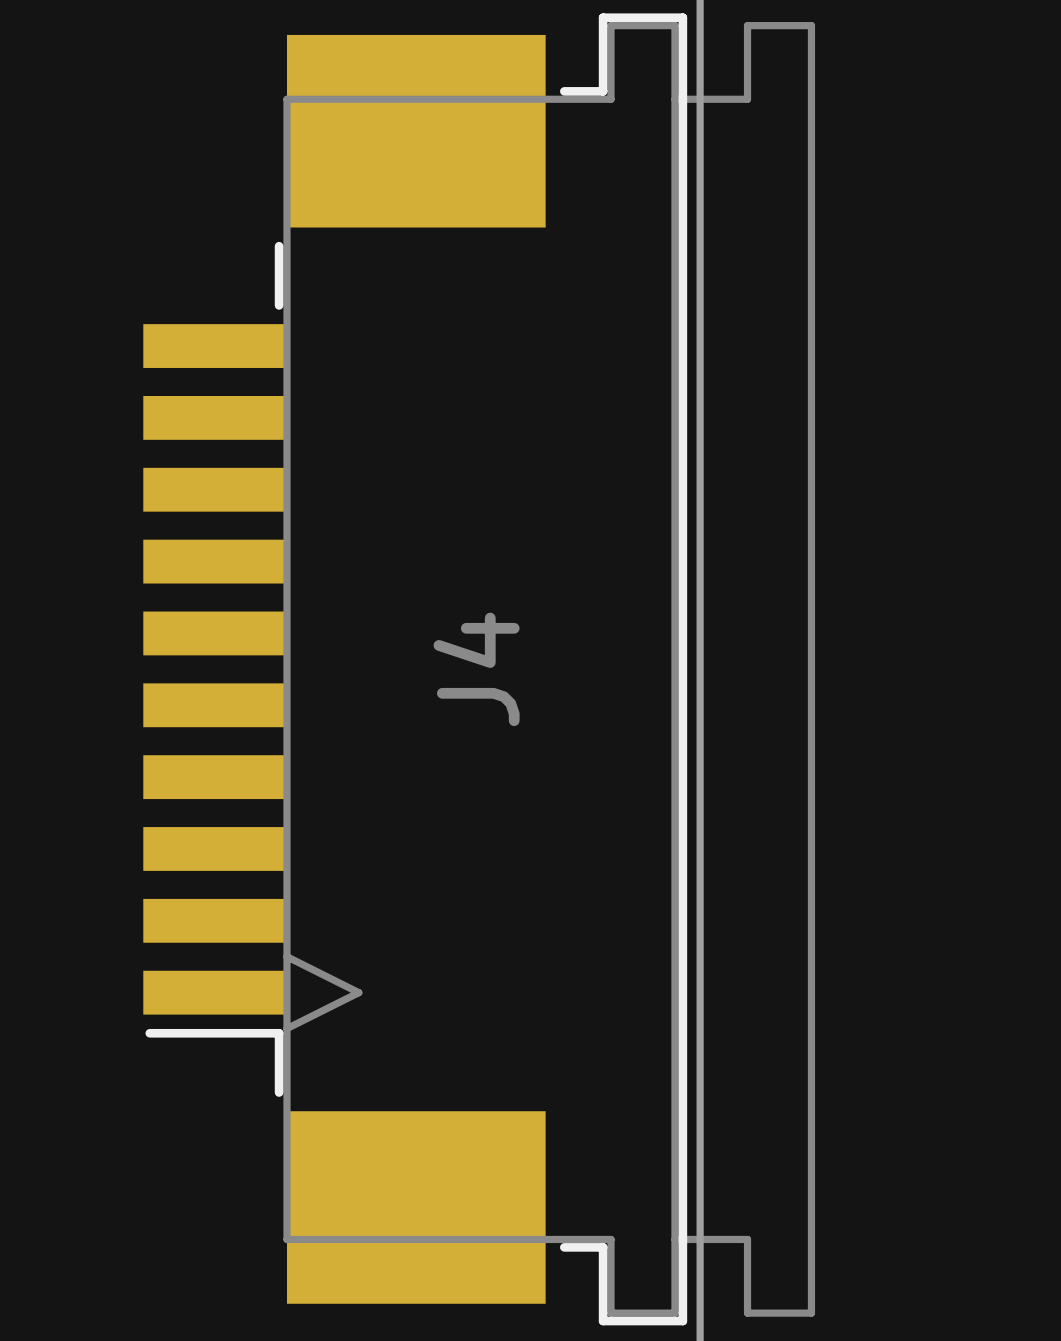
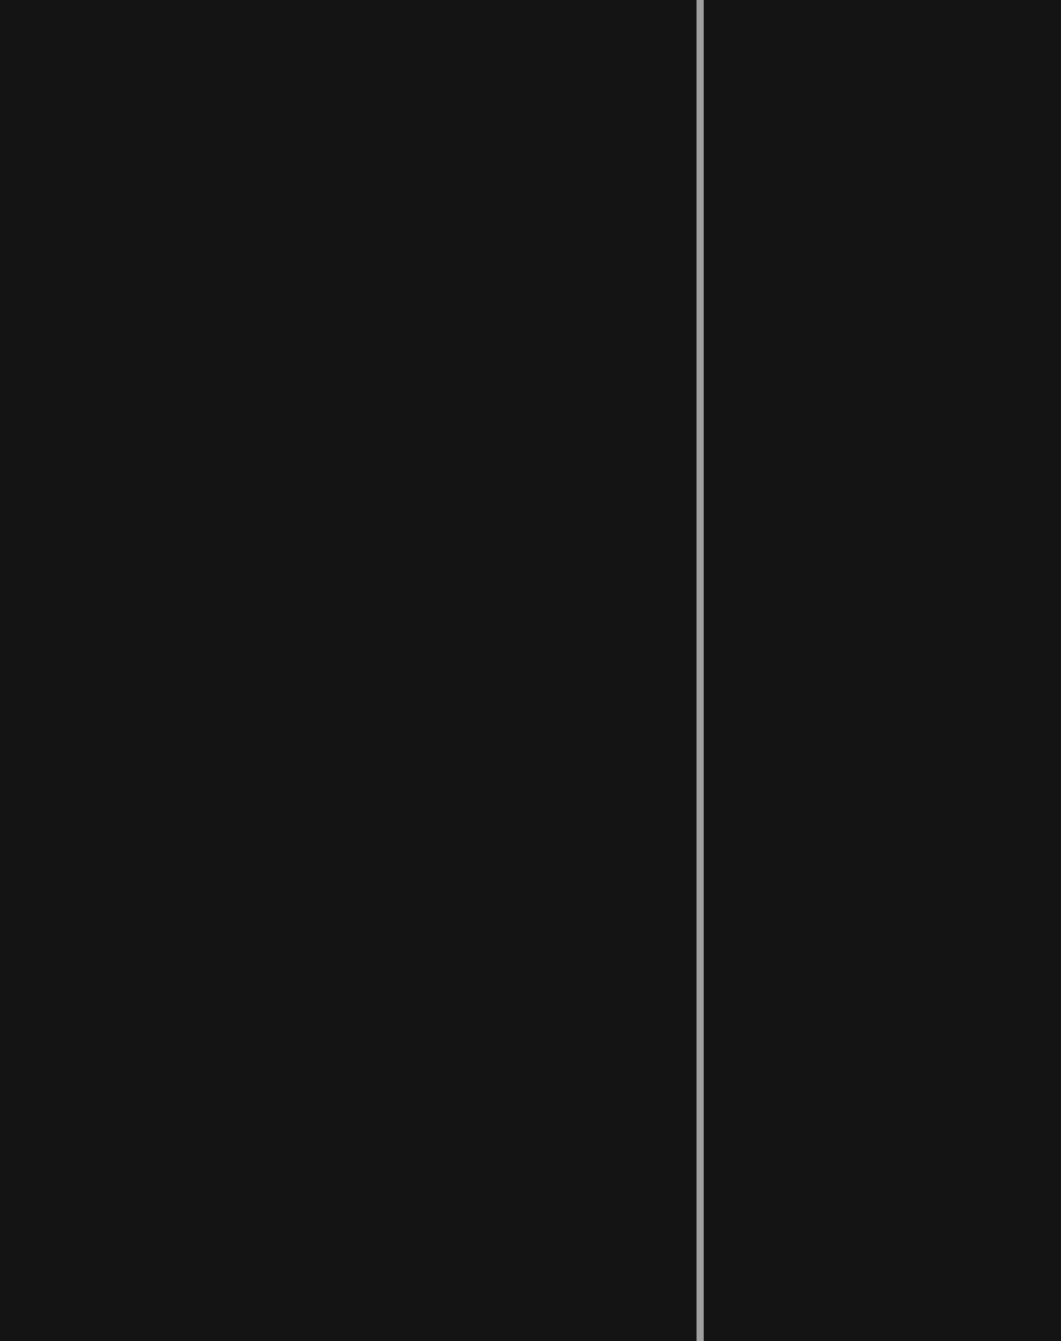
J4: (479, 669) -> none

